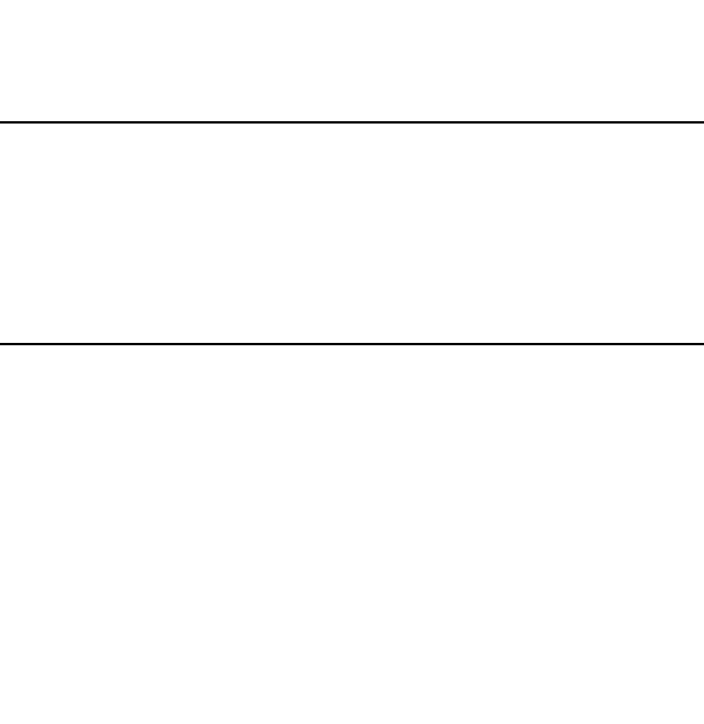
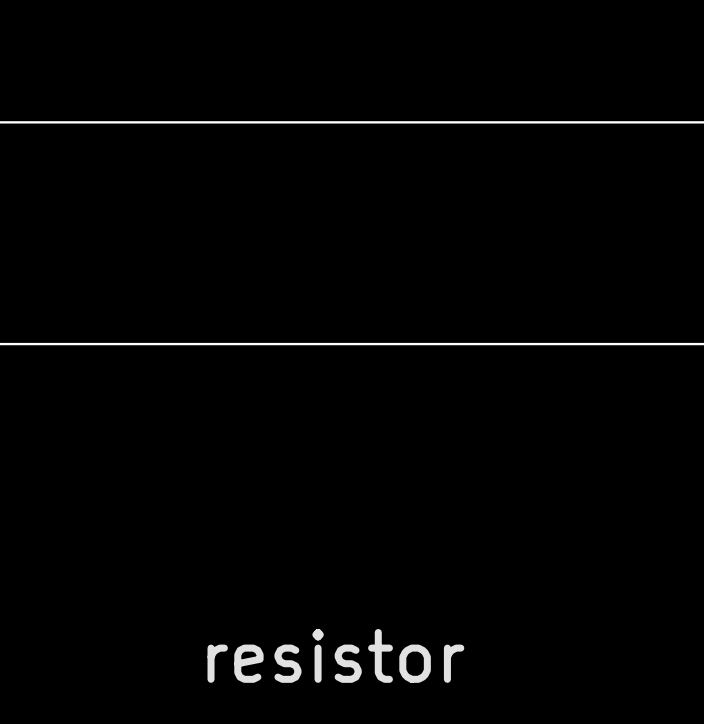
text: none -> resistor (335, 655)

